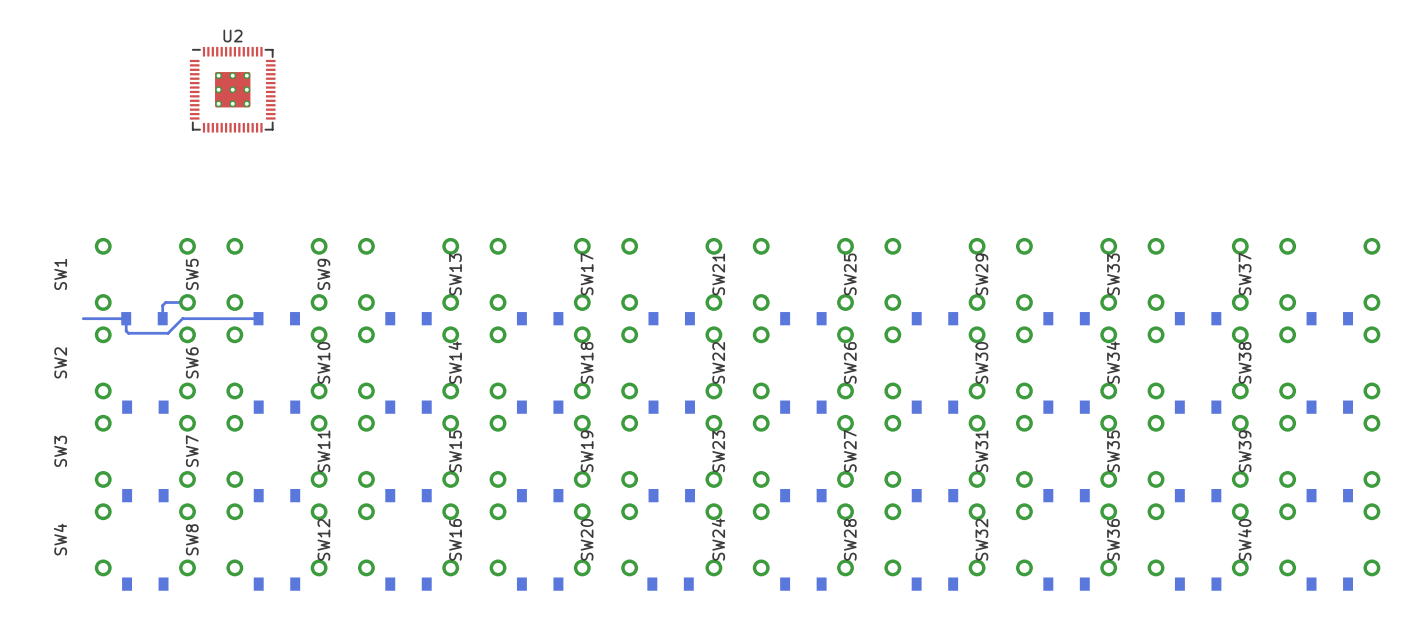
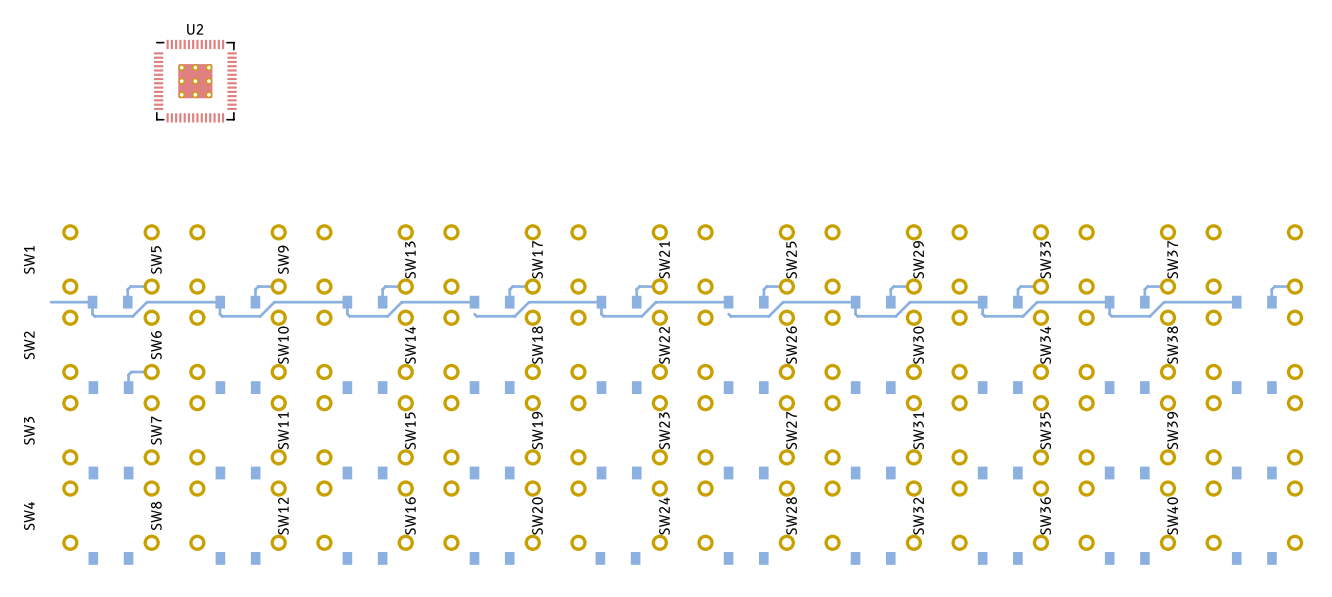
bottom track: none -> (279, 286) (258, 286) (255, 289) (255, 302)
bottom track: none -> (406, 286) (385, 286) (382, 289) (382, 302)
bottom track: none -> (533, 286) (512, 286) (509, 289) (509, 302)
bottom track: none -> (660, 286) (639, 286) (636, 289) (636, 302)
bottom track: none -> (787, 286) (766, 286) (763, 289) (763, 302)
bottom track: none -> (914, 286) (893, 286) (890, 289) (890, 302)
bottom track: none -> (1041, 286) (1020, 286) (1017, 289) (1017, 302)
bottom track: none -> (1168, 286) (1147, 286) (1144, 289) (1144, 302)
bottom track: none -> (1295, 286) (1274, 286) (1271, 289) (1271, 302)
bottom track: none -> (219, 302) (219, 314) (222, 316) (260, 316) (274, 302) (347, 302)
bottom track: none -> (347, 302) (347, 314) (349, 316) (387, 316) (401, 302) (475, 302)
bottom track: none -> (601, 302) (601, 314) (603, 316) (641, 316) (655, 302) (729, 302)
bottom track: none -> (602, 302) (529, 302) (514, 316) (476, 316) (474, 314)
bottom track: none -> (855, 302) (855, 314) (857, 316) (895, 316) (910, 302) (983, 302)
bottom track: none -> (856, 302) (783, 302) (769, 316) (730, 316) (728, 314)
bottom track: none -> (982, 302) (982, 314) (984, 316) (1023, 316) (1037, 302) (1110, 302)
bottom track: none -> (1109, 302) (1109, 314) (1111, 316) (1150, 316) (1164, 302) (1237, 302)
bottom track: none -> (152, 371) (131, 371) (128, 374) (128, 387)

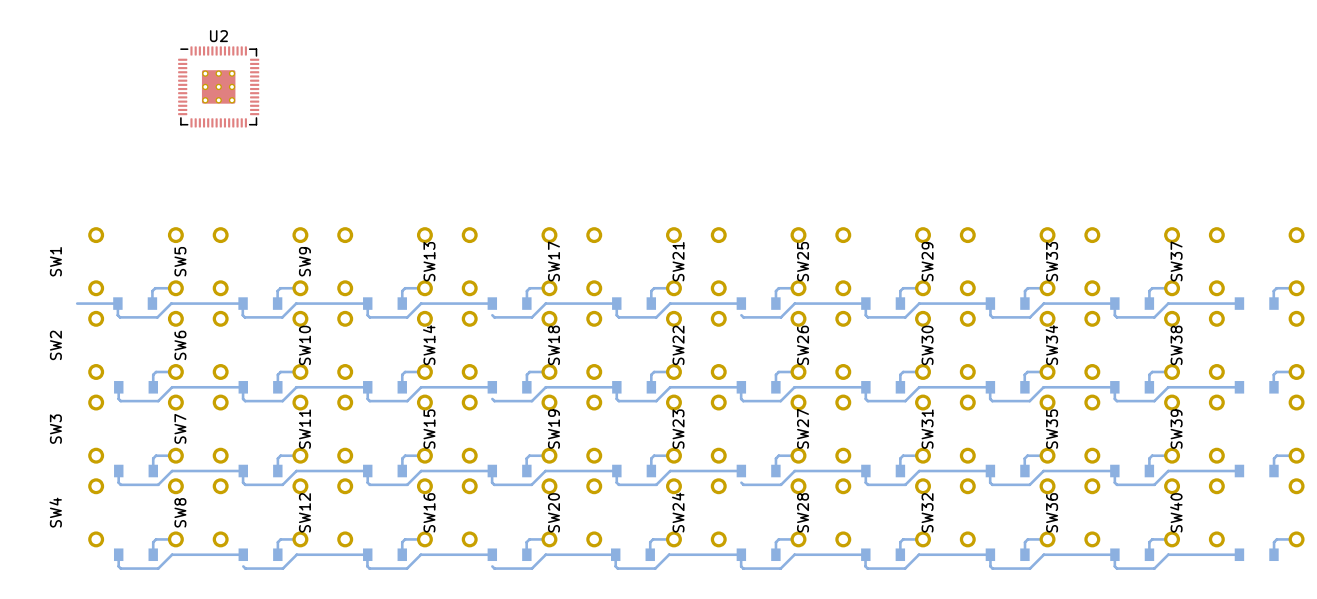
bottom track: none -> (301, 371) (280, 371) (277, 374) (277, 387)
bottom track: none -> (425, 371) (405, 371) (402, 374) (402, 387)
bottom track: none -> (550, 371) (529, 371) (526, 374) (526, 387)
bottom track: none -> (674, 371) (654, 371) (651, 374) (651, 387)
bottom track: none -> (799, 371) (778, 371) (775, 374) (775, 387)
bottom track: none -> (923, 371) (903, 371) (900, 374) (900, 387)
bottom track: none -> (1048, 371) (1027, 371) (1024, 374) (1024, 387)
bottom track: none -> (1172, 371) (1152, 371) (1149, 374) (1149, 387)
bottom track: none -> (1297, 371) (1276, 371) (1273, 374) (1273, 387)
bottom track: none -> (118, 387) (118, 398) (120, 401) (158, 401) (172, 387) (243, 387)
bottom track: none -> (243, 387) (243, 398) (245, 401) (282, 401) (296, 387) (368, 387)
bottom track: none -> (367, 387) (367, 398) (369, 401) (407, 401) (421, 387) (492, 387)
bottom track: none -> (616, 387) (616, 398) (618, 401) (656, 401) (670, 387) (741, 387)
bottom track: none -> (617, 387) (545, 387) (531, 401) (494, 401) (492, 398)
bottom track: none -> (741, 387) (741, 398) (743, 401) (780, 401) (794, 387) (866, 387)
bottom track: none -> (865, 387) (865, 398) (867, 401) (905, 401) (919, 387) (990, 387)
bottom track: none -> (990, 387) (990, 398) (992, 401) (1029, 401) (1043, 387) (1115, 387)
bottom track: none -> (1114, 387) (1114, 398) (1116, 401) (1154, 401) (1168, 387) (1240, 387)
bottom track: none -> (176, 455) (156, 455) (153, 458) (153, 471)
bottom track: none -> (301, 455) (280, 455) (277, 458) (277, 471)
bottom track: none -> (425, 455) (405, 455) (402, 458) (402, 471)
bottom track: none -> (550, 455) (529, 455) (526, 458) (526, 471)
bottom track: none -> (674, 455) (654, 455) (651, 458) (651, 471)
bottom track: none -> (799, 455) (778, 455) (775, 458) (775, 471)
bottom track: none -> (923, 455) (903, 455) (900, 458) (900, 471)
bottom track: none -> (1048, 455) (1027, 455) (1024, 458) (1024, 471)
bottom track: none -> (1172, 455) (1152, 455) (1149, 458) (1149, 471)
bottom track: none -> (1297, 455) (1276, 455) (1274, 458) (1274, 471)
bottom track: none -> (118, 471) (118, 482) (120, 484) (158, 484) (172, 471) (243, 471)
bottom track: none -> (243, 471) (243, 482) (245, 484) (282, 484) (296, 471) (368, 471)
bottom track: none -> (367, 471) (367, 482) (369, 484) (407, 484) (421, 471) (492, 471)
bottom track: none -> (492, 471) (492, 482) (494, 484) (531, 484) (545, 471) (617, 471)
bottom track: none -> (616, 471) (616, 482) (618, 484) (656, 484) (670, 471) (741, 471)
bottom track: none -> (865, 471) (865, 482) (867, 484) (905, 484) (919, 471) (990, 471)
bottom track: none -> (866, 471) (794, 471) (781, 484) (743, 484) (741, 482)
bottom track: none -> (990, 471) (990, 482) (992, 484) (1029, 484) (1043, 471) (1115, 471)
bottom track: none -> (1114, 471) (1114, 482) (1116, 484) (1154, 484) (1168, 471) (1240, 471)
bottom track: none -> (176, 539) (156, 539) (153, 542) (153, 554)
bottom track: none -> (301, 539) (280, 539) (277, 542) (277, 554)
bottom track: none -> (425, 539) (405, 539) (402, 542) (402, 554)
bottom track: none -> (550, 539) (529, 539) (526, 542) (526, 554)
bottom track: none -> (673, 539) (653, 539) (650, 542) (650, 554)
bottom track: none -> (799, 539) (778, 539) (775, 542) (775, 554)
bottom track: none -> (923, 539) (903, 539) (900, 542) (900, 554)
bottom track: none -> (1048, 539) (1027, 539) (1025, 542) (1025, 554)
bottom track: none -> (1172, 539) (1152, 539) (1149, 542) (1149, 554)
bottom track: none -> (1297, 539) (1276, 539) (1274, 542) (1274, 554)
bottom track: none -> (118, 554) (118, 566) (120, 568) (158, 568) (172, 554) (243, 554)
bottom track: none -> (367, 554) (367, 566) (369, 568) (407, 568) (420, 554) (492, 554)
bottom track: none -> (368, 554) (296, 554) (282, 568) (245, 568) (243, 566)
bottom track: none -> (615, 554) (615, 566) (617, 568) (655, 568) (669, 554) (740, 554)
bottom track: none -> (617, 554) (545, 554) (531, 568) (494, 568) (492, 566)
bottom track: none -> (741, 554) (741, 566) (743, 568) (780, 568) (794, 554) (866, 554)
bottom track: none -> (865, 554) (865, 566) (867, 568) (905, 568) (918, 554) (990, 554)
bottom track: none -> (990, 554) (990, 566) (992, 568) (1030, 568) (1043, 554) (1115, 554)
bottom track: none -> (1114, 554) (1114, 566) (1116, 568) (1154, 568) (1168, 554) (1240, 554)

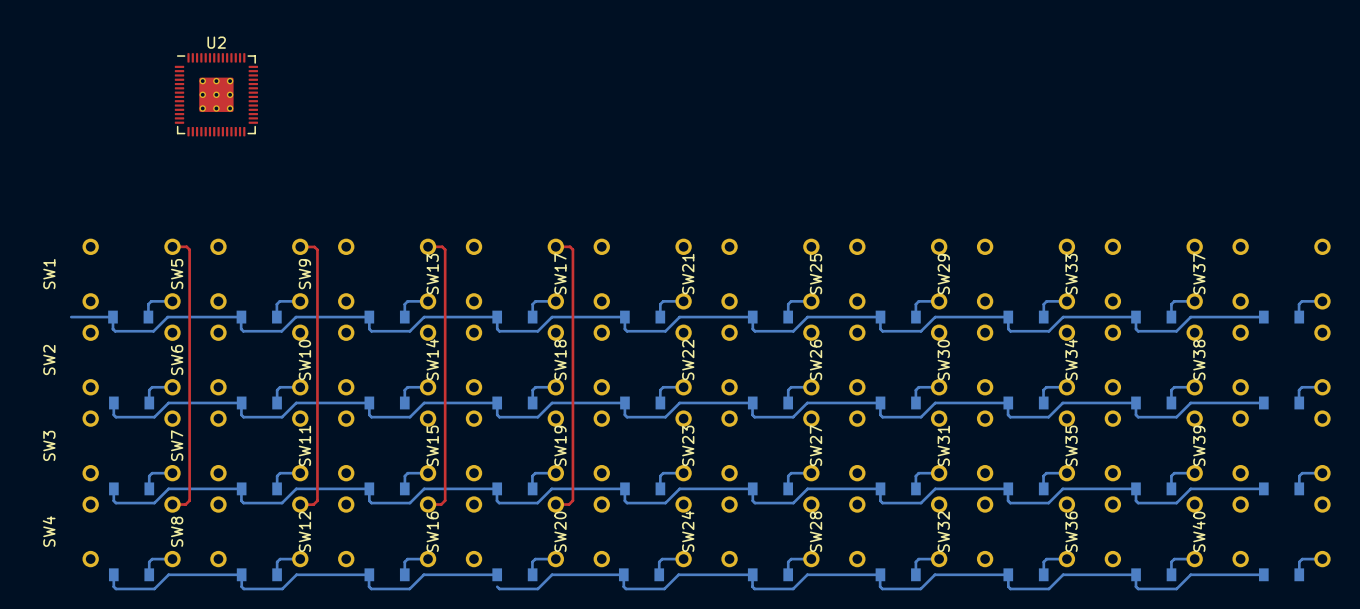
top track: none -> (172, 246) (186, 246) (189, 249) (189, 500) (185, 504) (172, 504)
top track: none -> (300, 246) (314, 246) (317, 249) (317, 500) (313, 504) (300, 504)
top track: none -> (428, 246) (442, 246) (445, 249) (445, 500) (441, 504) (428, 504)
top track: none -> (555, 246) (570, 246) (572, 249) (572, 500) (569, 504) (555, 504)
bottom track: none -> (497, 317) (497, 329)
bottom track: none -> (752, 317) (752, 329)
bottom track: none -> (497, 402) (497, 414)
bottom track: none -> (752, 488) (752, 500)
bottom track: none -> (241, 574) (241, 586)

